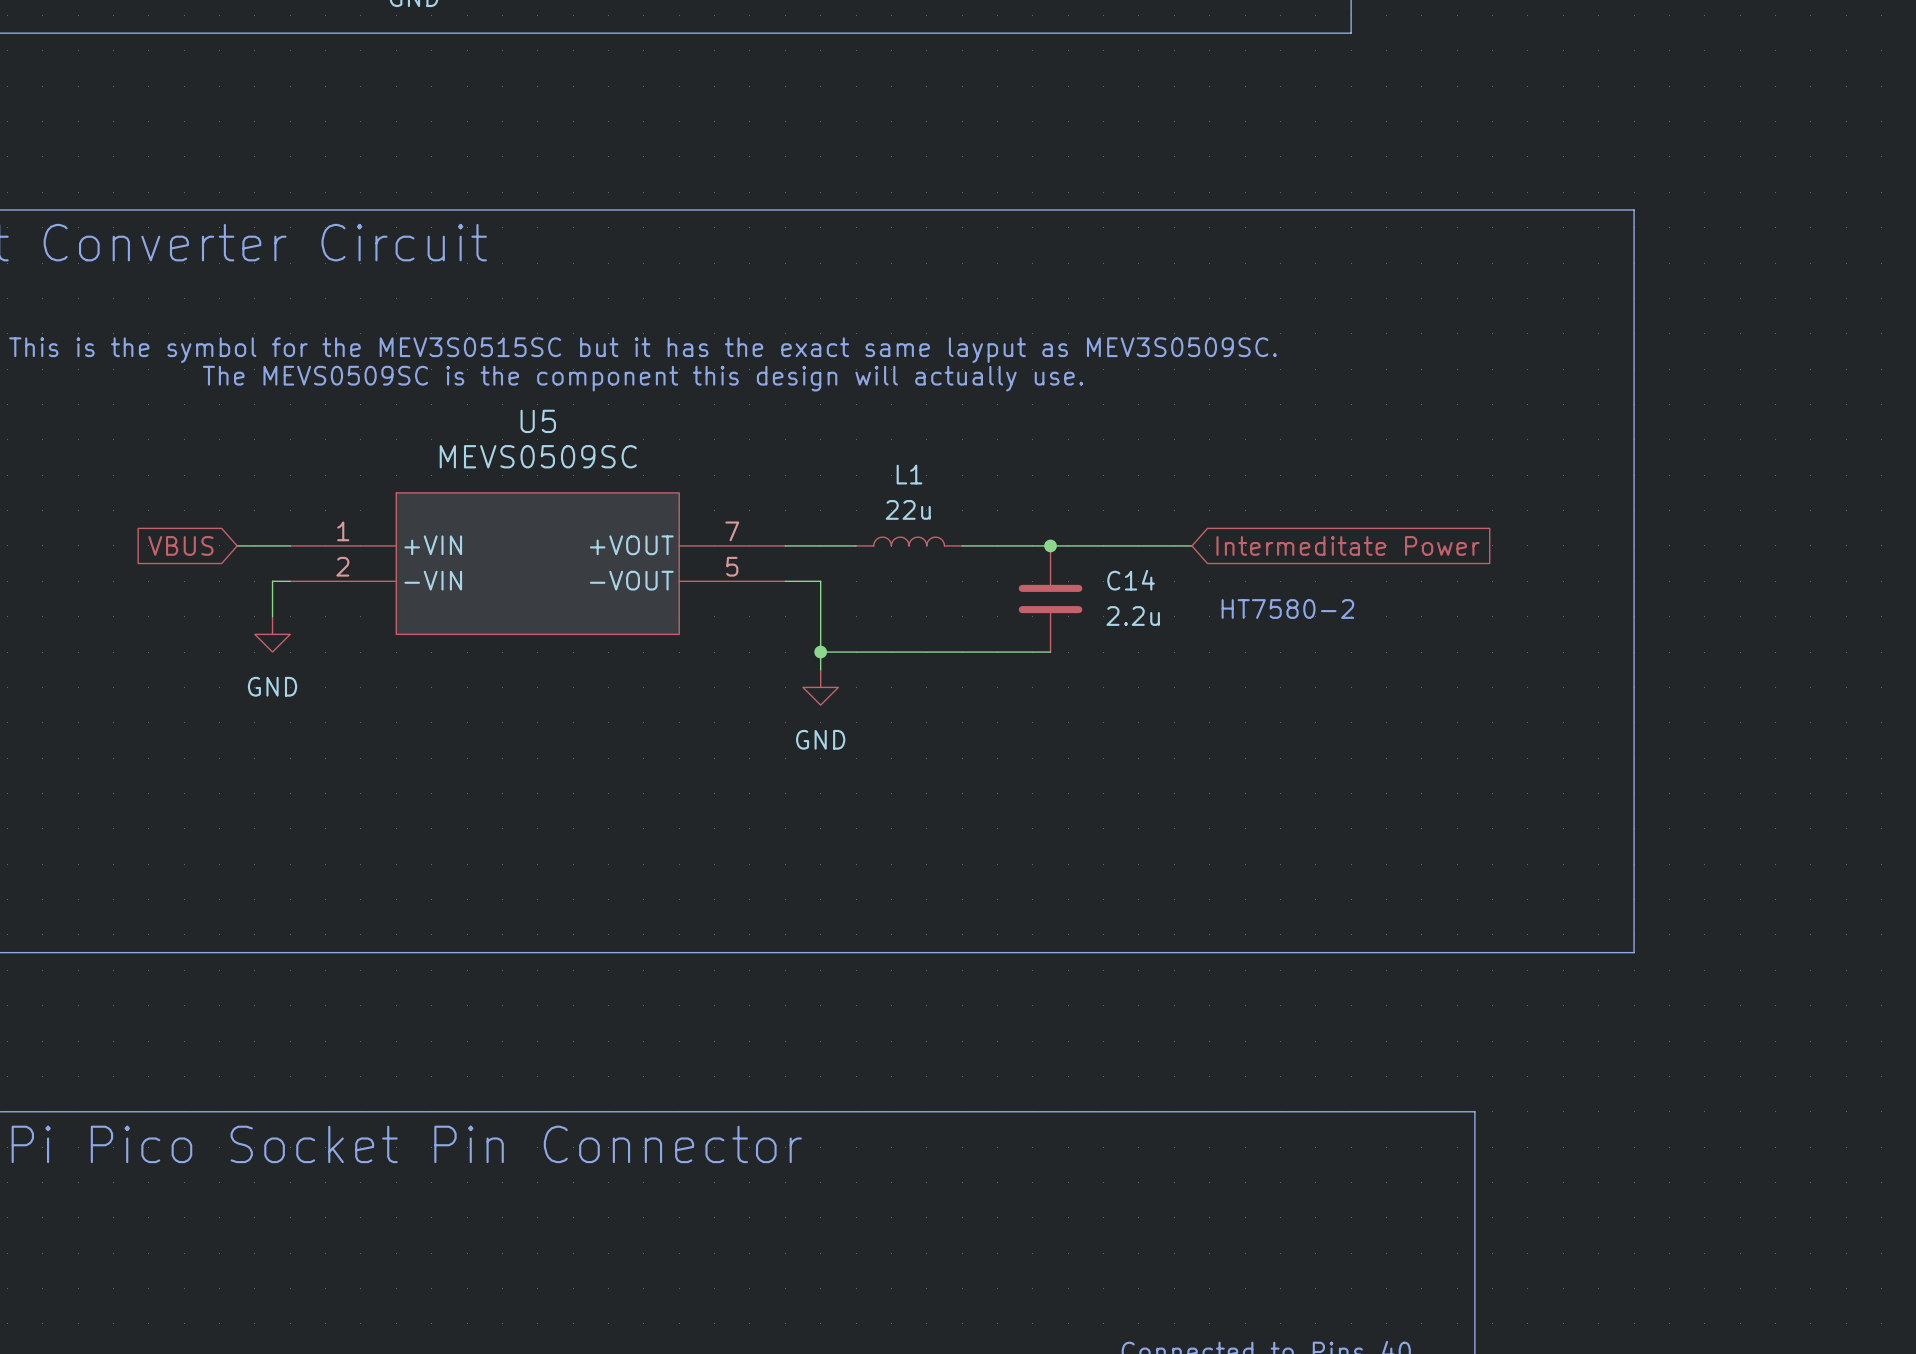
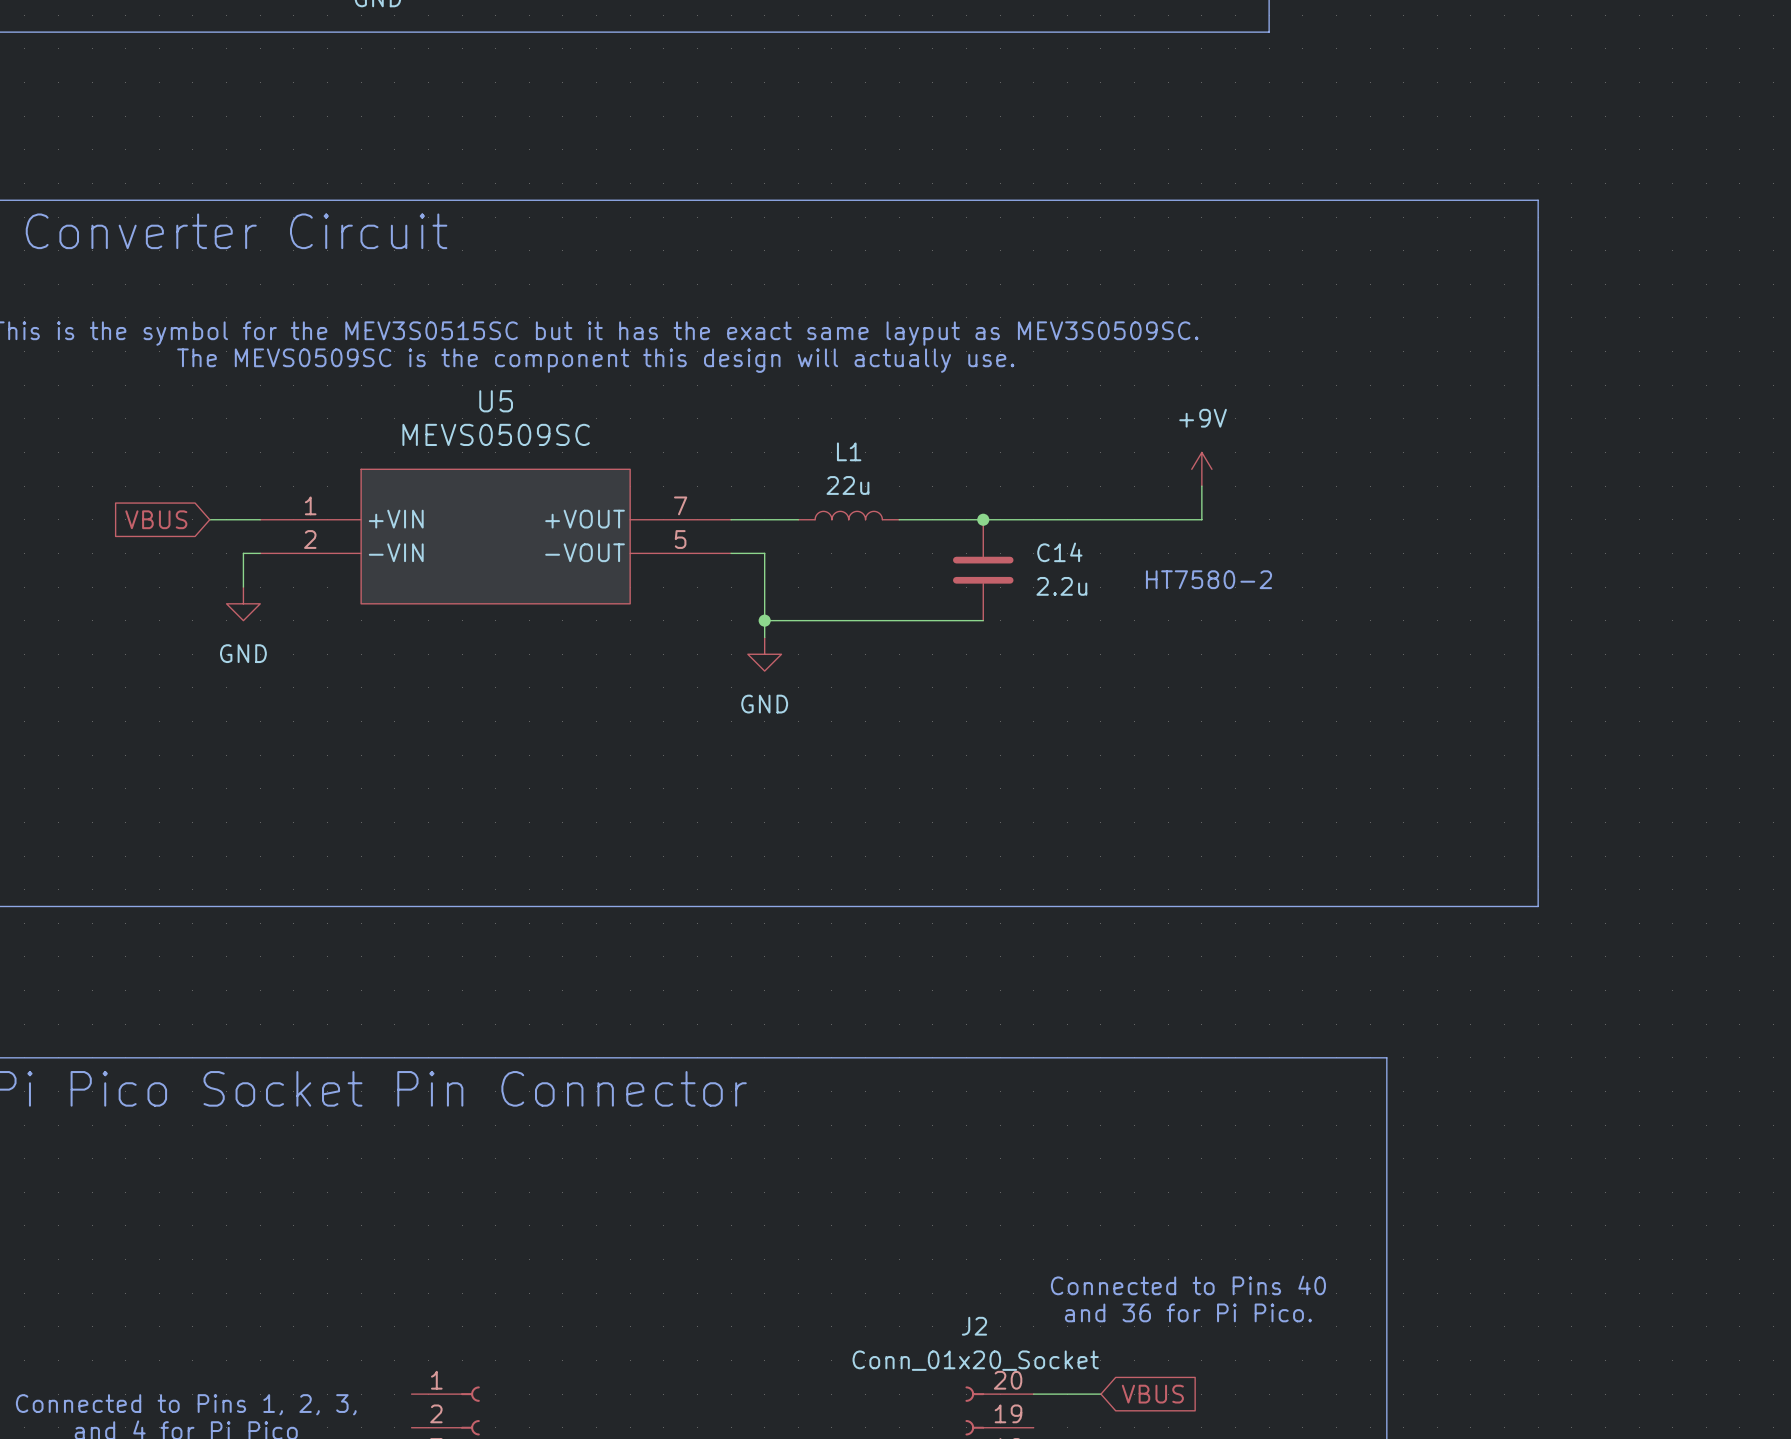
power symbol: none -> +9V (1201, 469)
wire: none -> (1201, 486) (1201, 519) (1117, 519)
global label: Intermeditate Power (1348, 545) -> none

